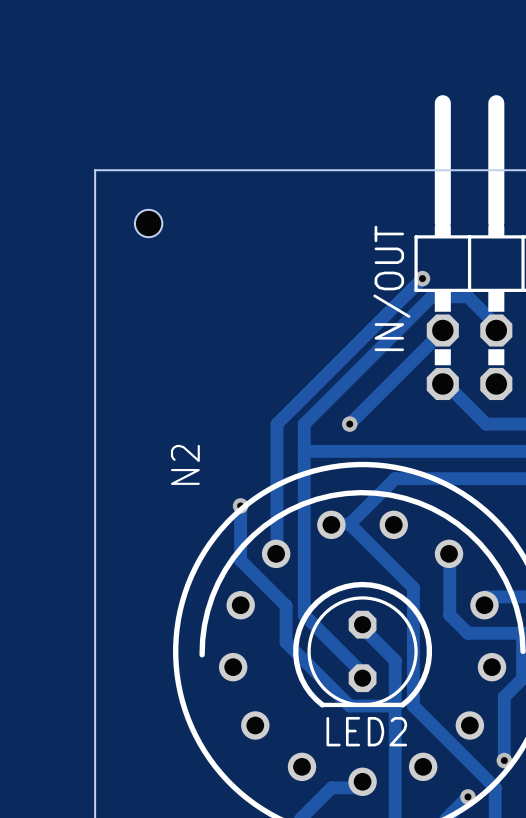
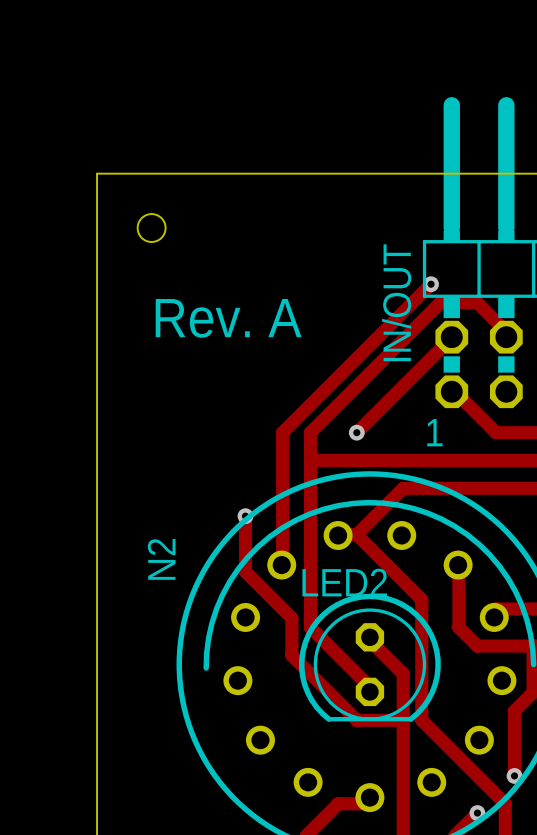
text: none -> Rev. A (228, 318)
text: none -> 1 (434, 432)
N2 name position: N2 (185, 464) -> N2 (161, 559)
LED2 name position: LED2 (366, 731) -> LED2 (344, 582)

